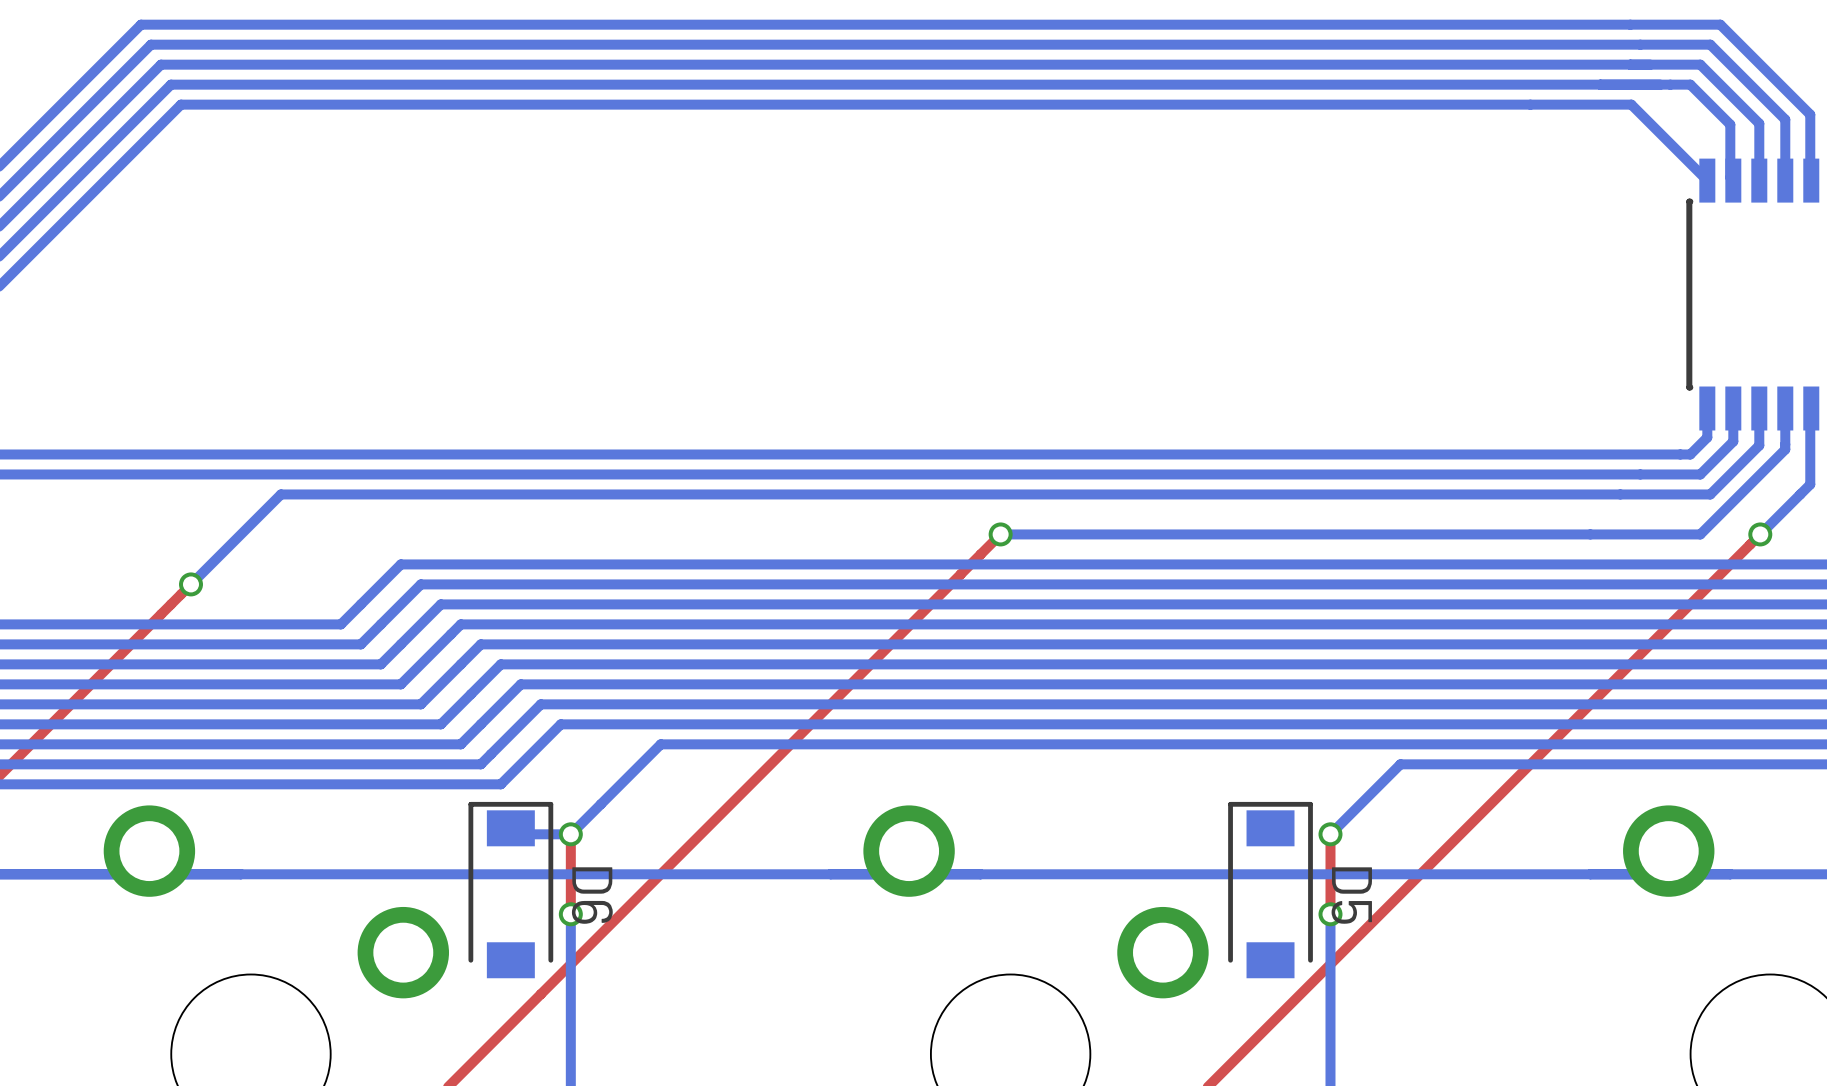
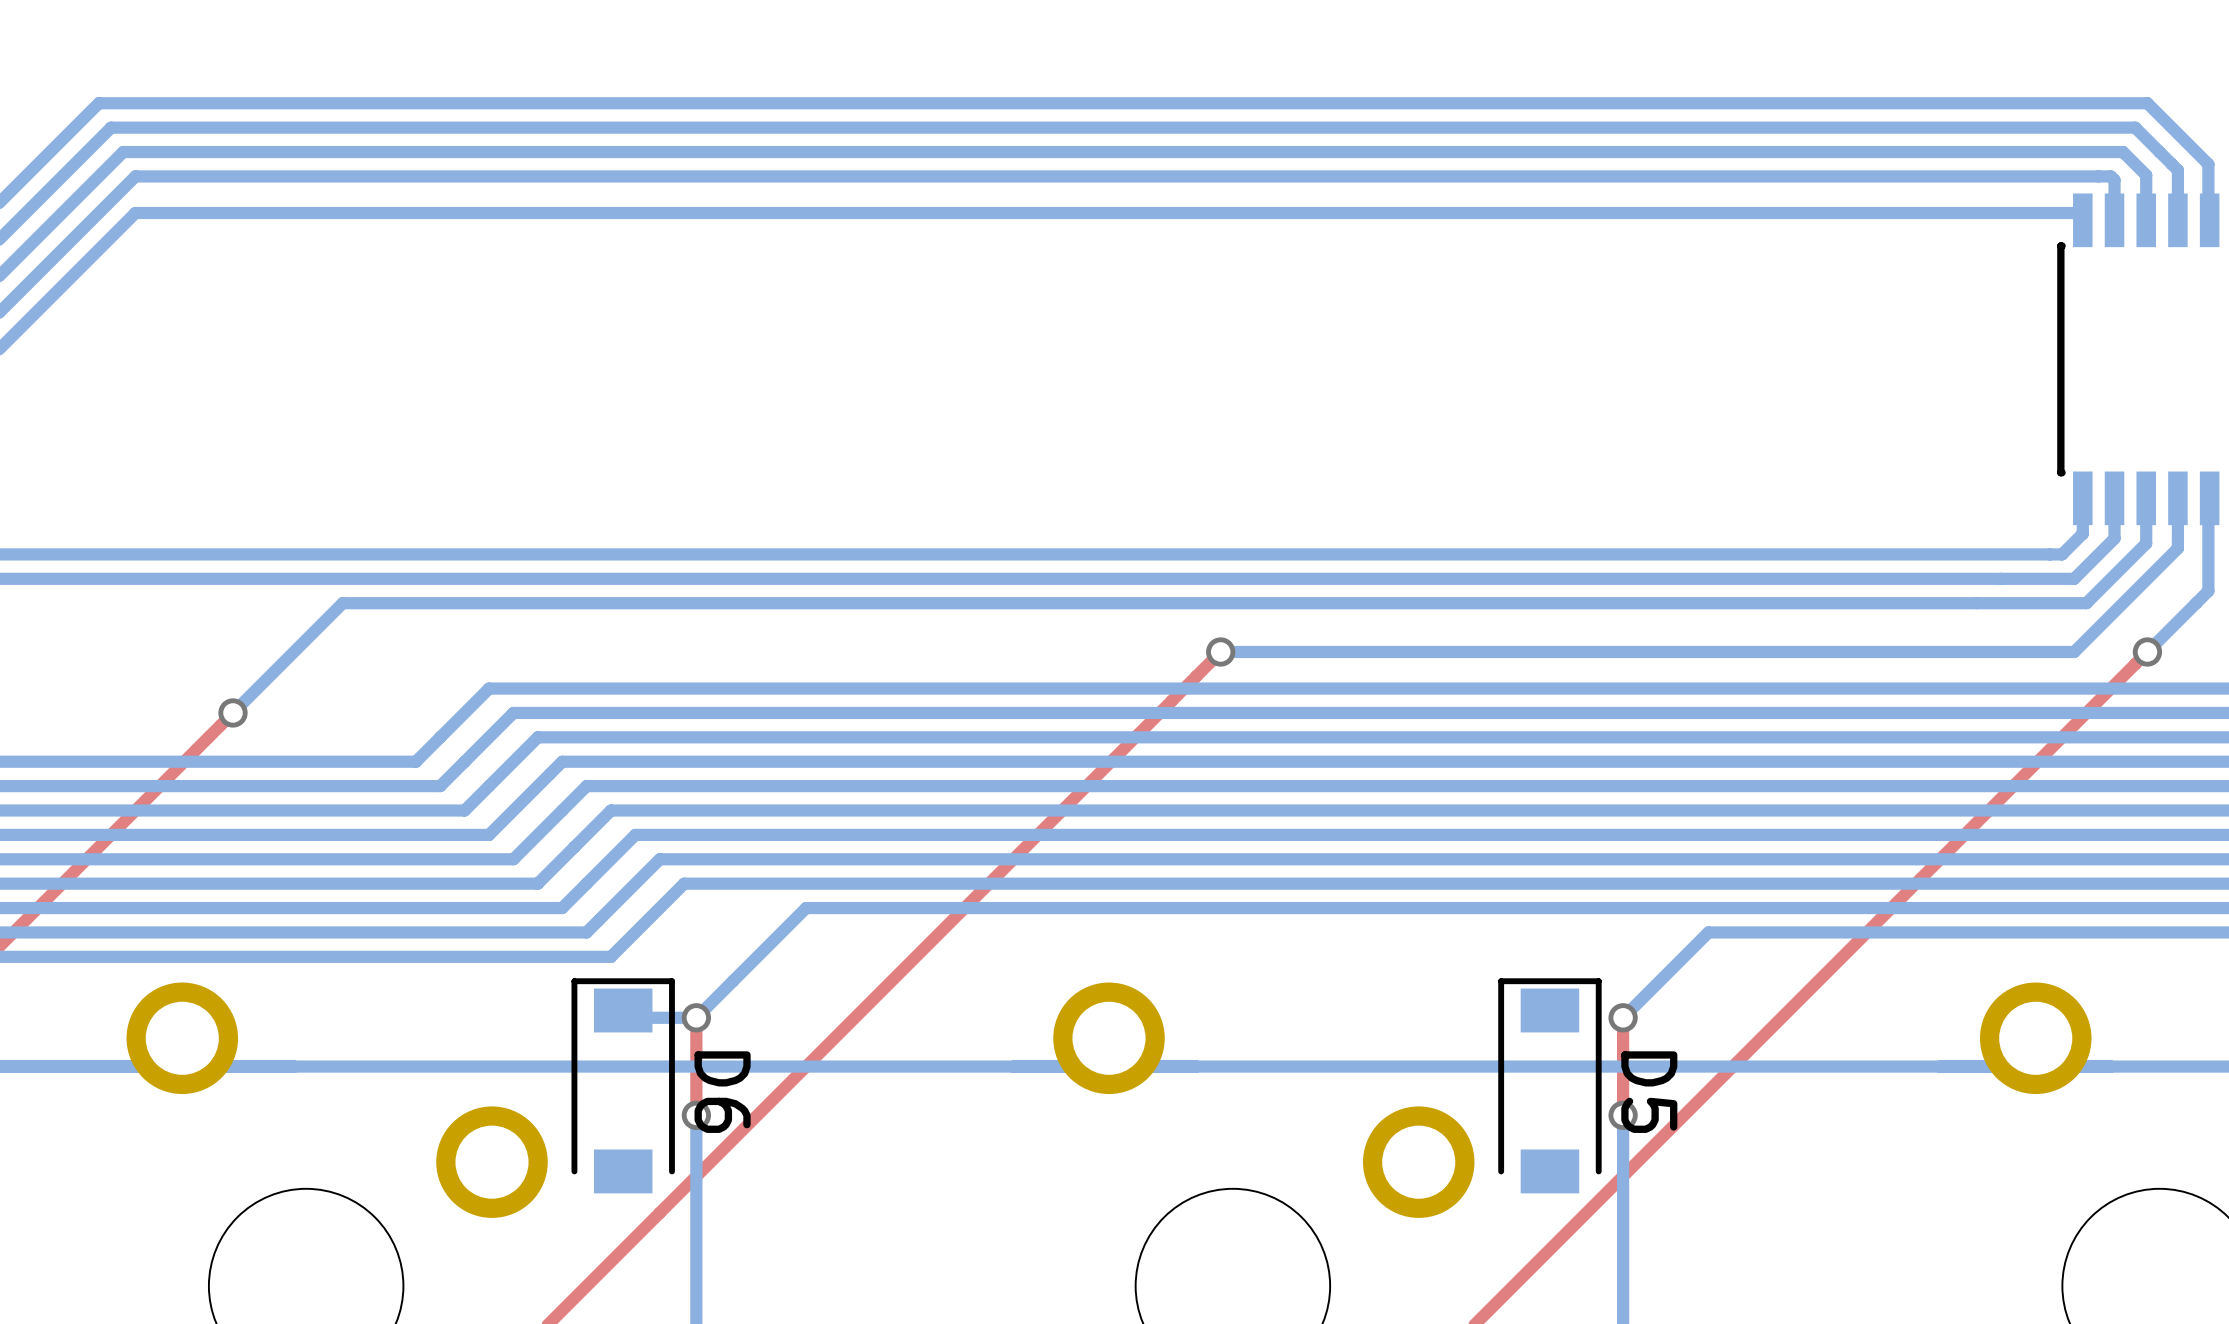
bottom track: (81, 84) (141, 24) (1720, 24) (1810, 114) (1810, 134) -> none
bottom track: (171, 84) (111, 144) -> (208, 103) (98, 103)
bottom track: (1690, 84) (1730, 124) (1730, 177) (1733, 180) -> (2062, 103) (2147, 103) (2208, 164)
bottom track: (91, 104) (151, 44) (1710, 44) (1785, 119) (1785, 139) -> none
bottom track: (181, 104) (111, 174) -> (220, 127) (111, 127)
bottom track: (1631, 104) (1701, 174) -> (1990, 127) (2135, 127) (2177, 170)
bottom track: (101, 124) (161, 64) (1700, 64) (1759, 123) (1759, 143) -> (123, 152) (2123, 152) (2146, 175)
bottom track: none -> (135, 176) (2110, 176) (2114, 180) (2114, 220)
bottom track: none -> (2075, 213) (135, 213)

